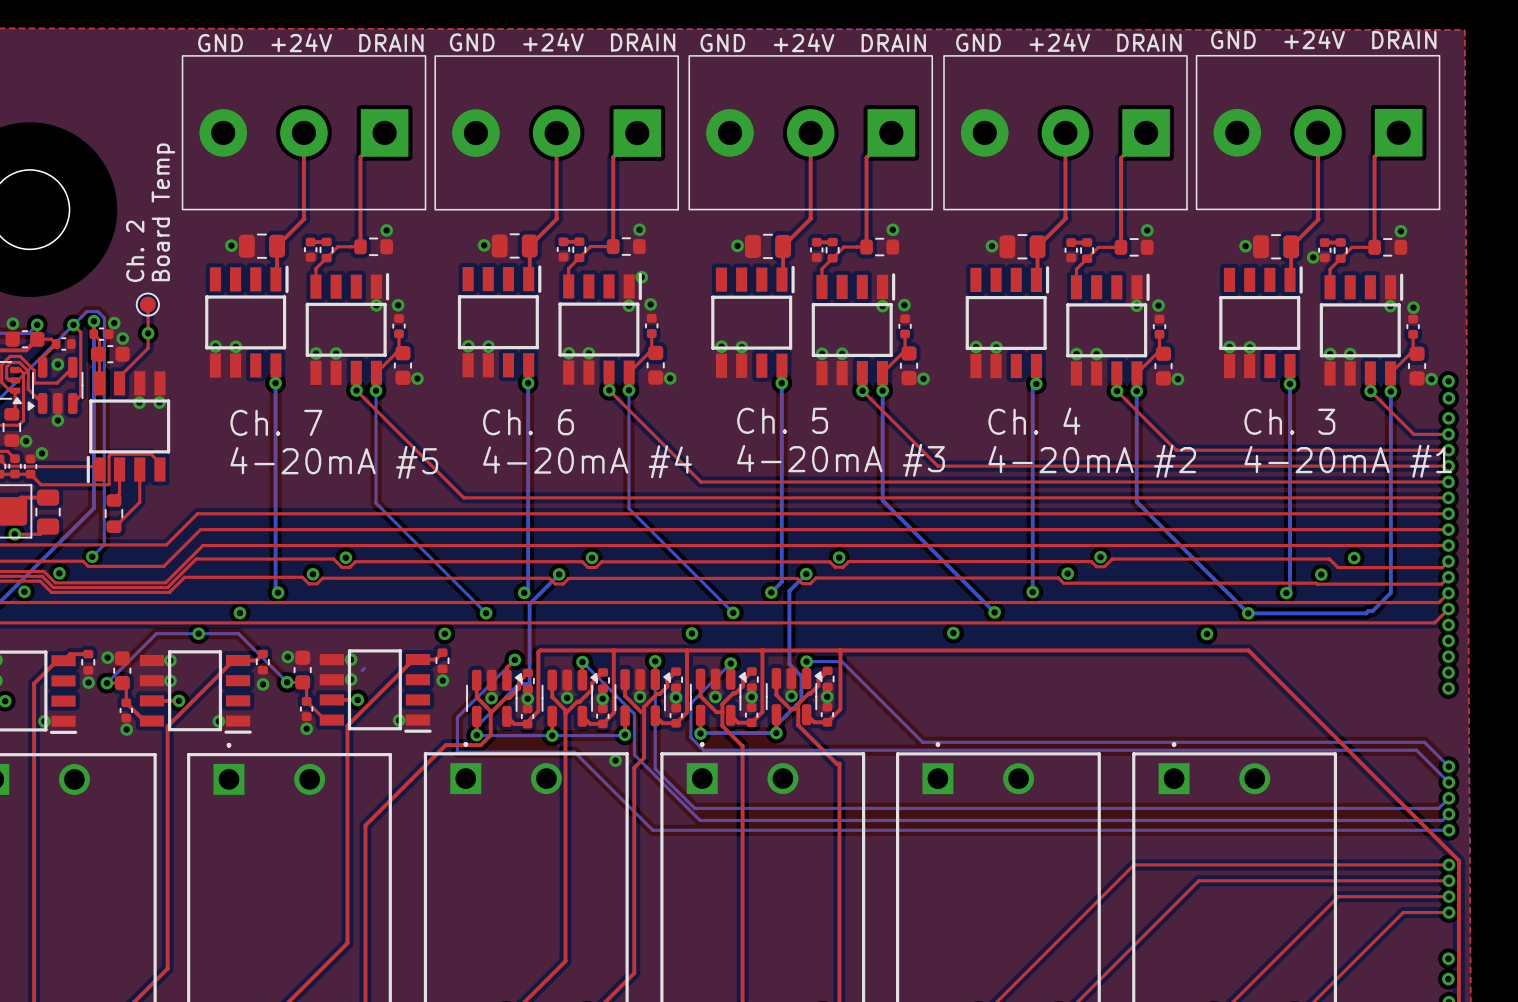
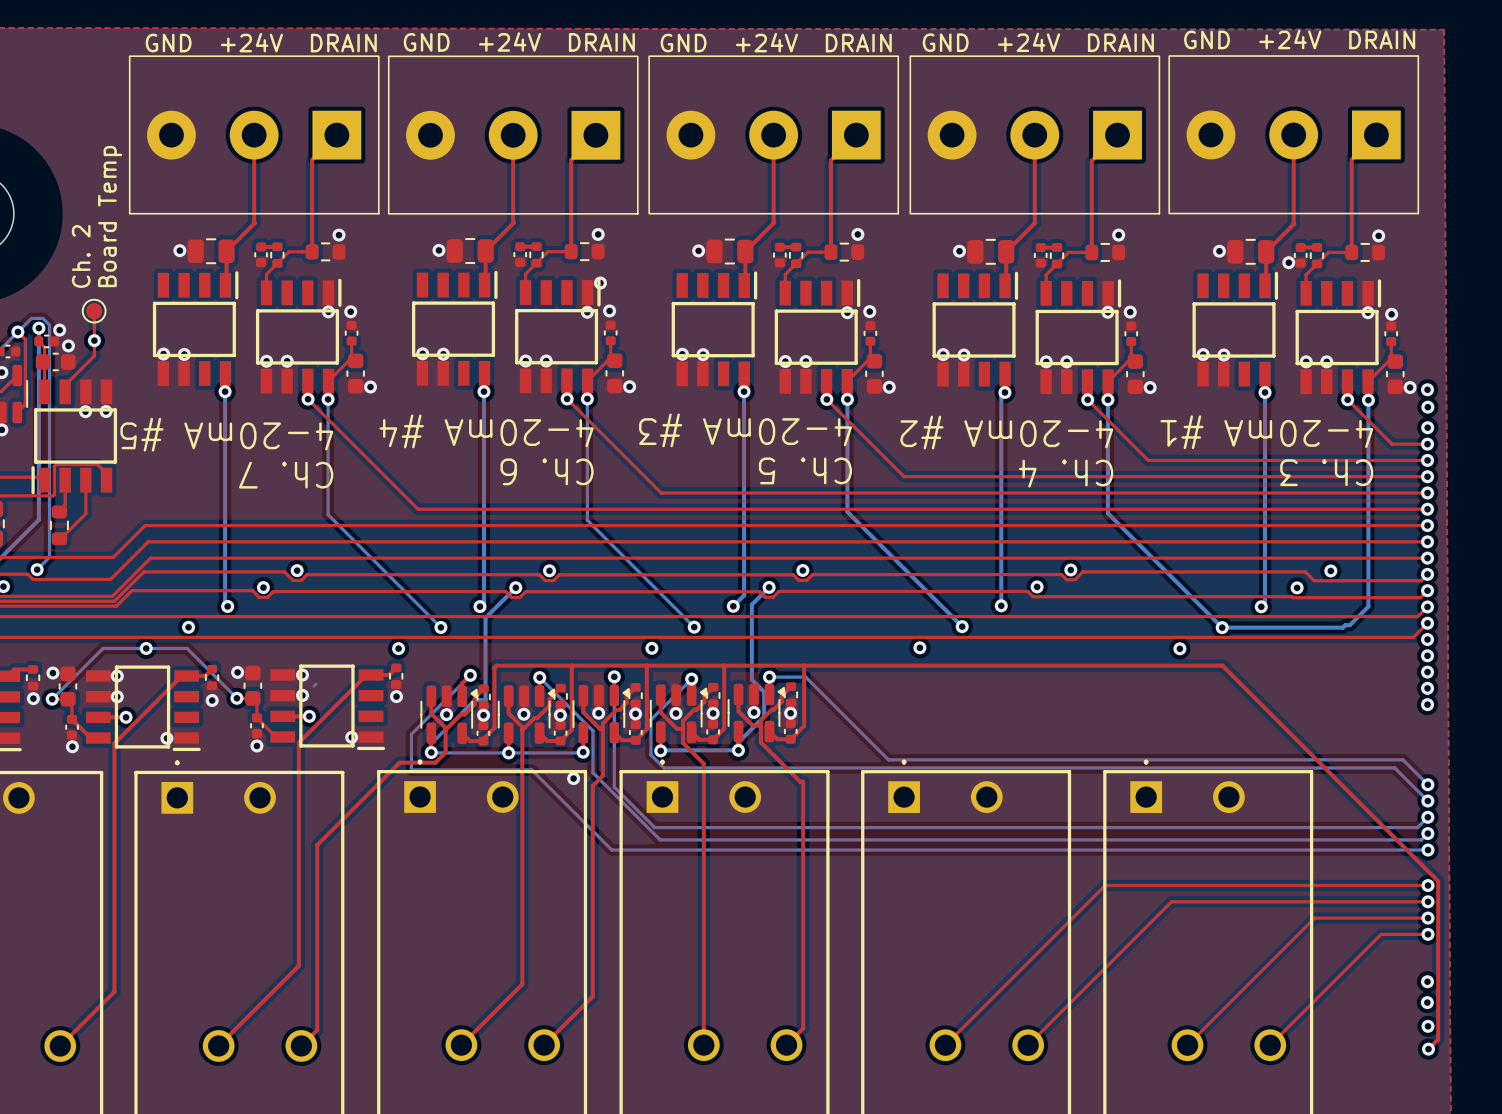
text rotation: 0° (782, 420) -> 180° (805, 470)
text rotation: 0° (1034, 421) -> 180° (1066, 473)
text rotation: 0° (1289, 421) -> 180° (1326, 472)
text rotation: 0° (276, 422) -> 180° (286, 475)
text rotation: 0° (528, 422) -> 180° (547, 471)
text rotation: 0° (841, 460) -> 180° (745, 430)
text rotation: 0° (587, 461) -> 180° (486, 431)
text rotation: 0° (1092, 461) -> 180° (1006, 432)
text rotation: 0° (1348, 461) -> 180° (1266, 432)
text rotation: 0° (334, 462) -> 180° (226, 434)

